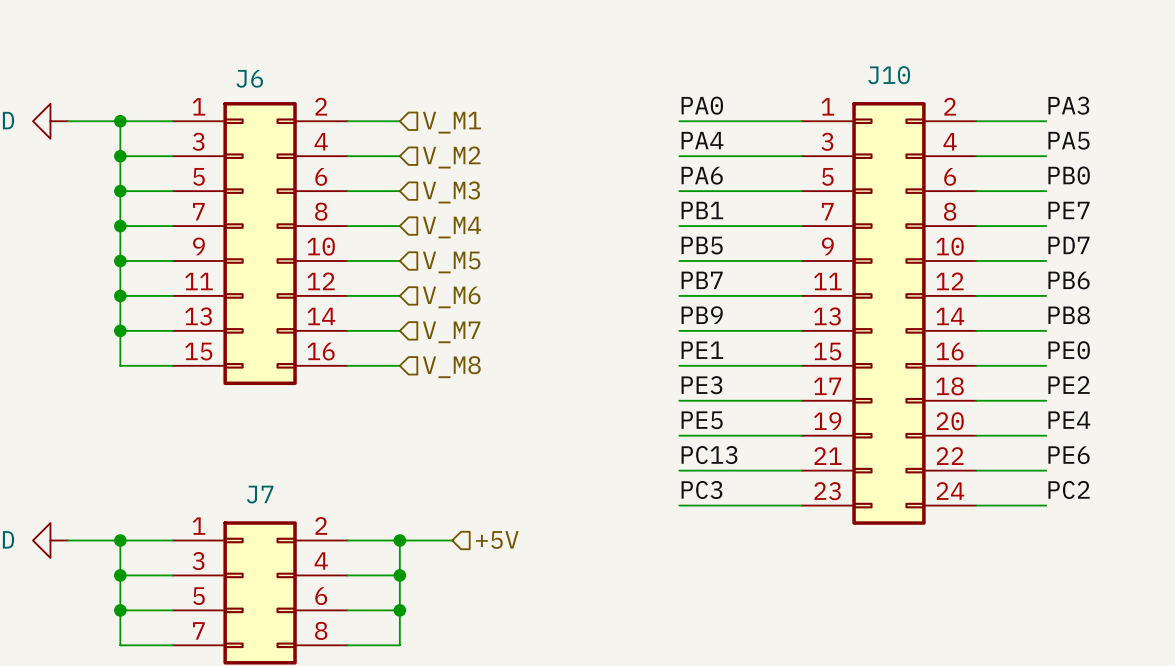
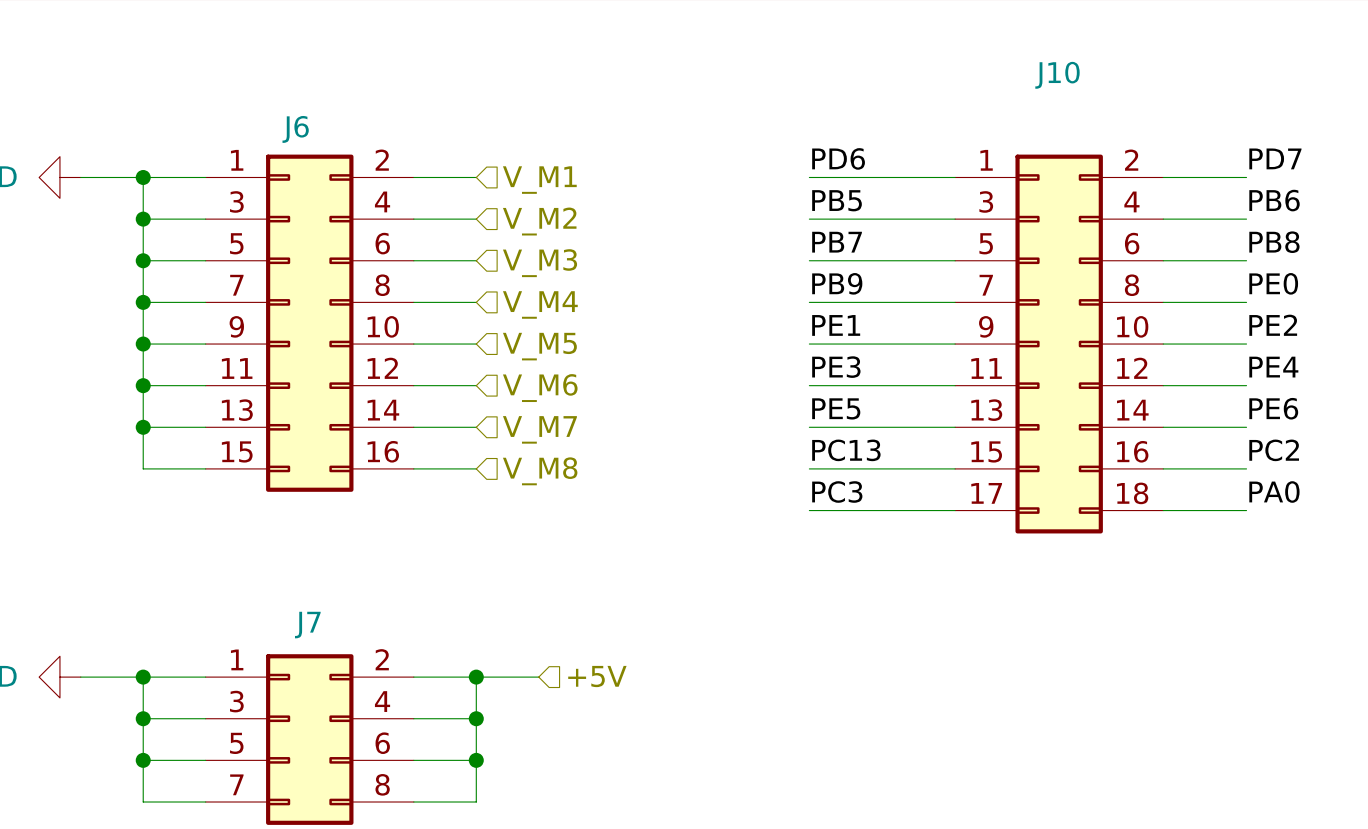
J10 symbol: [801, 102, 977, 525] -> [955, 154, 1164, 534]
label: PA0 (702, 105) -> PD6 (838, 158)
label: PA3 (1068, 105) -> PD7 (1275, 158)
label: PA4 (702, 140) -> PB5 (837, 200)
label: PA5 (1069, 140) -> PB6 (1274, 200)
label: PA6 (702, 175) -> PB7 (837, 242)
label: PB0 (1069, 175) -> PB8 (1274, 242)
label: PB1 (702, 210) -> PB9 (837, 283)
label: PE7 (1068, 210) -> PE0 (1273, 283)
label: PB5 (702, 245) -> PE1 (836, 325)
label: PD7 (1068, 245) -> PE2 (1273, 325)
label: PB7 (702, 280) -> PE3 (836, 367)
label: PB6 (1069, 280) -> PE4 (1273, 367)
label: PB9 (702, 315) -> PE5 (836, 408)
label: PB8 (1069, 315) -> PE6 (1273, 408)
label: PE1 (702, 350) -> PC13 (846, 450)
label: PE0 (1069, 350) -> PC2 (1274, 450)
label: PE3 (701, 385) -> PC3 (837, 492)
label: PE2 (1069, 385) -> PA0 (1274, 492)
label: PE5 (702, 420) -> none
label: PE4 (1069, 420) -> none
wire: (679, 435) (801, 435) -> none
wire: (976, 435) (1046, 435) -> none
label: PC13 (709, 455) -> none
label: PE6 (1069, 455) -> none
wire: (679, 470) (801, 470) -> none
wire: (976, 470) (1046, 470) -> none
label: PC3 (701, 489) -> none
label: PC2 (1069, 489) -> none
wire: (679, 505) (801, 505) -> none
wire: (976, 505) (1046, 505) -> none

